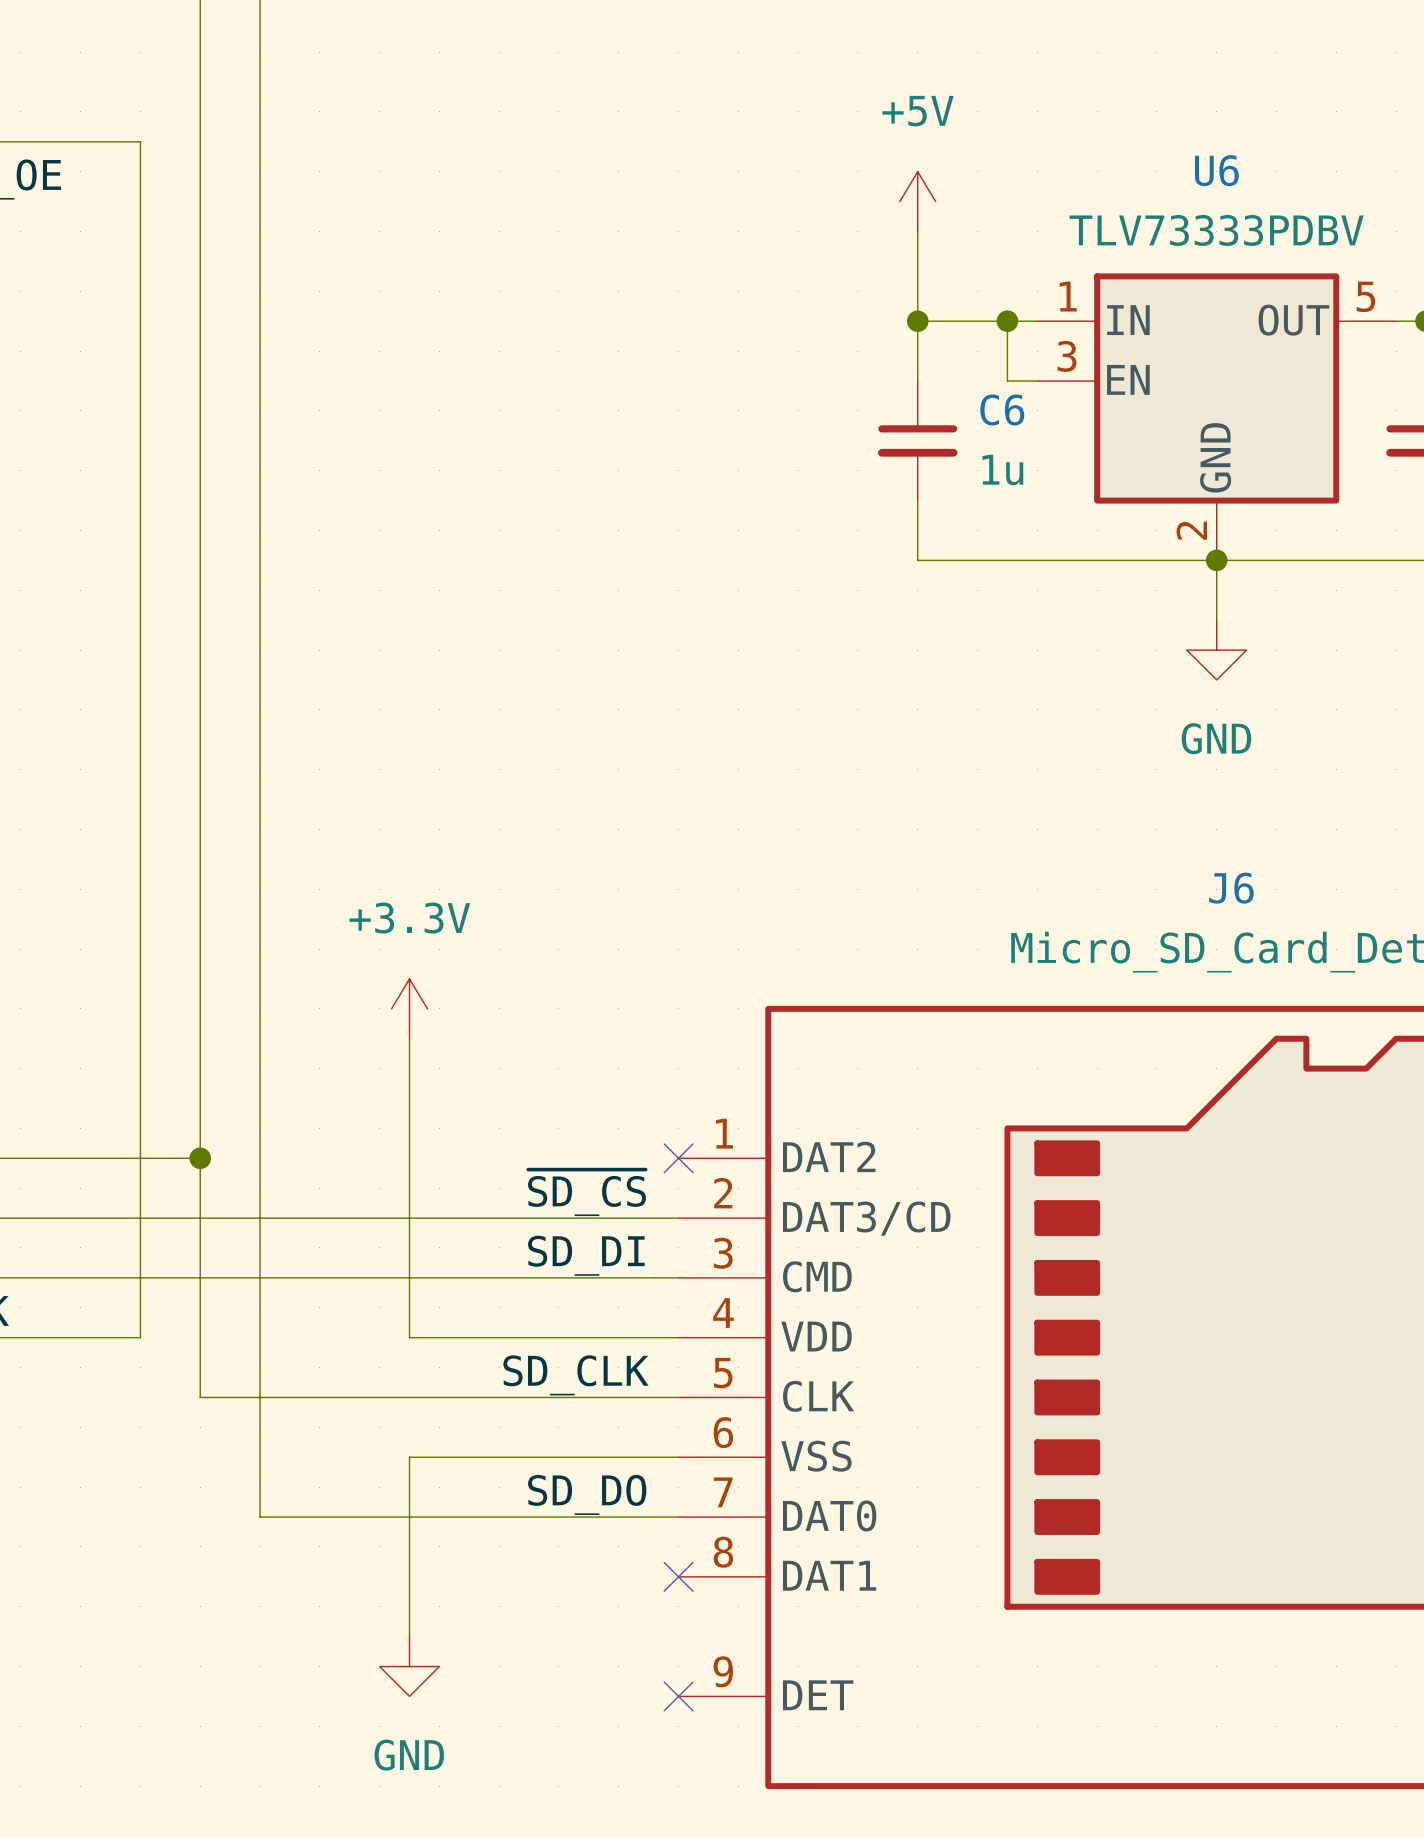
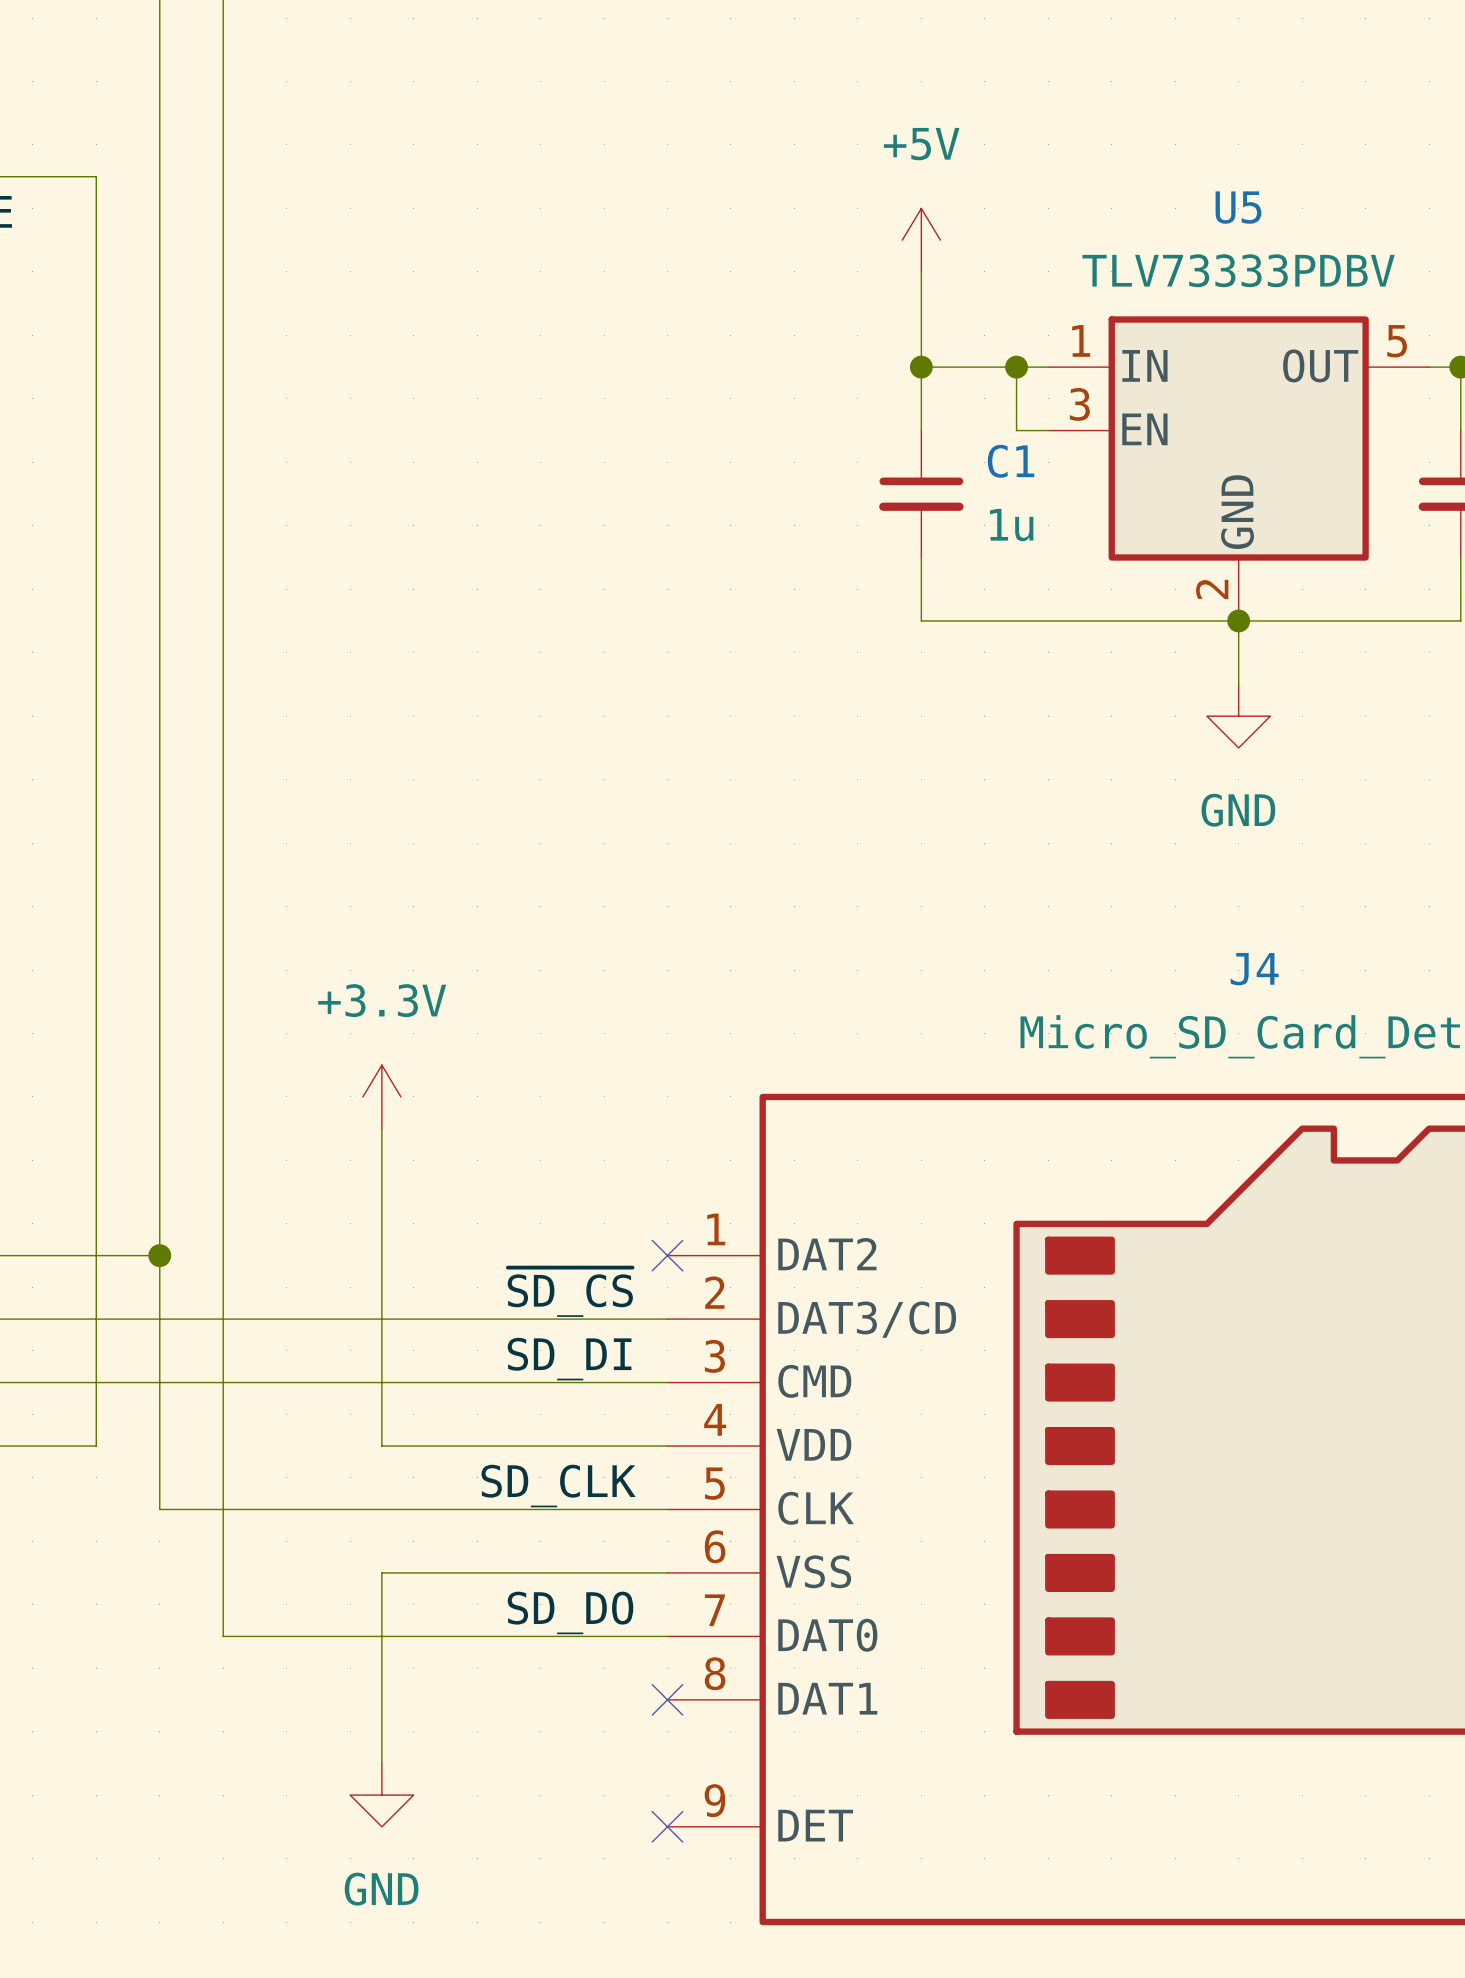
U6 name: U6 (1216, 170) -> U5 (1238, 207)
C6 name: C6 (1002, 409) -> C1 (1011, 461)
J6 name: J6 (1231, 888) -> J4 (1254, 969)

